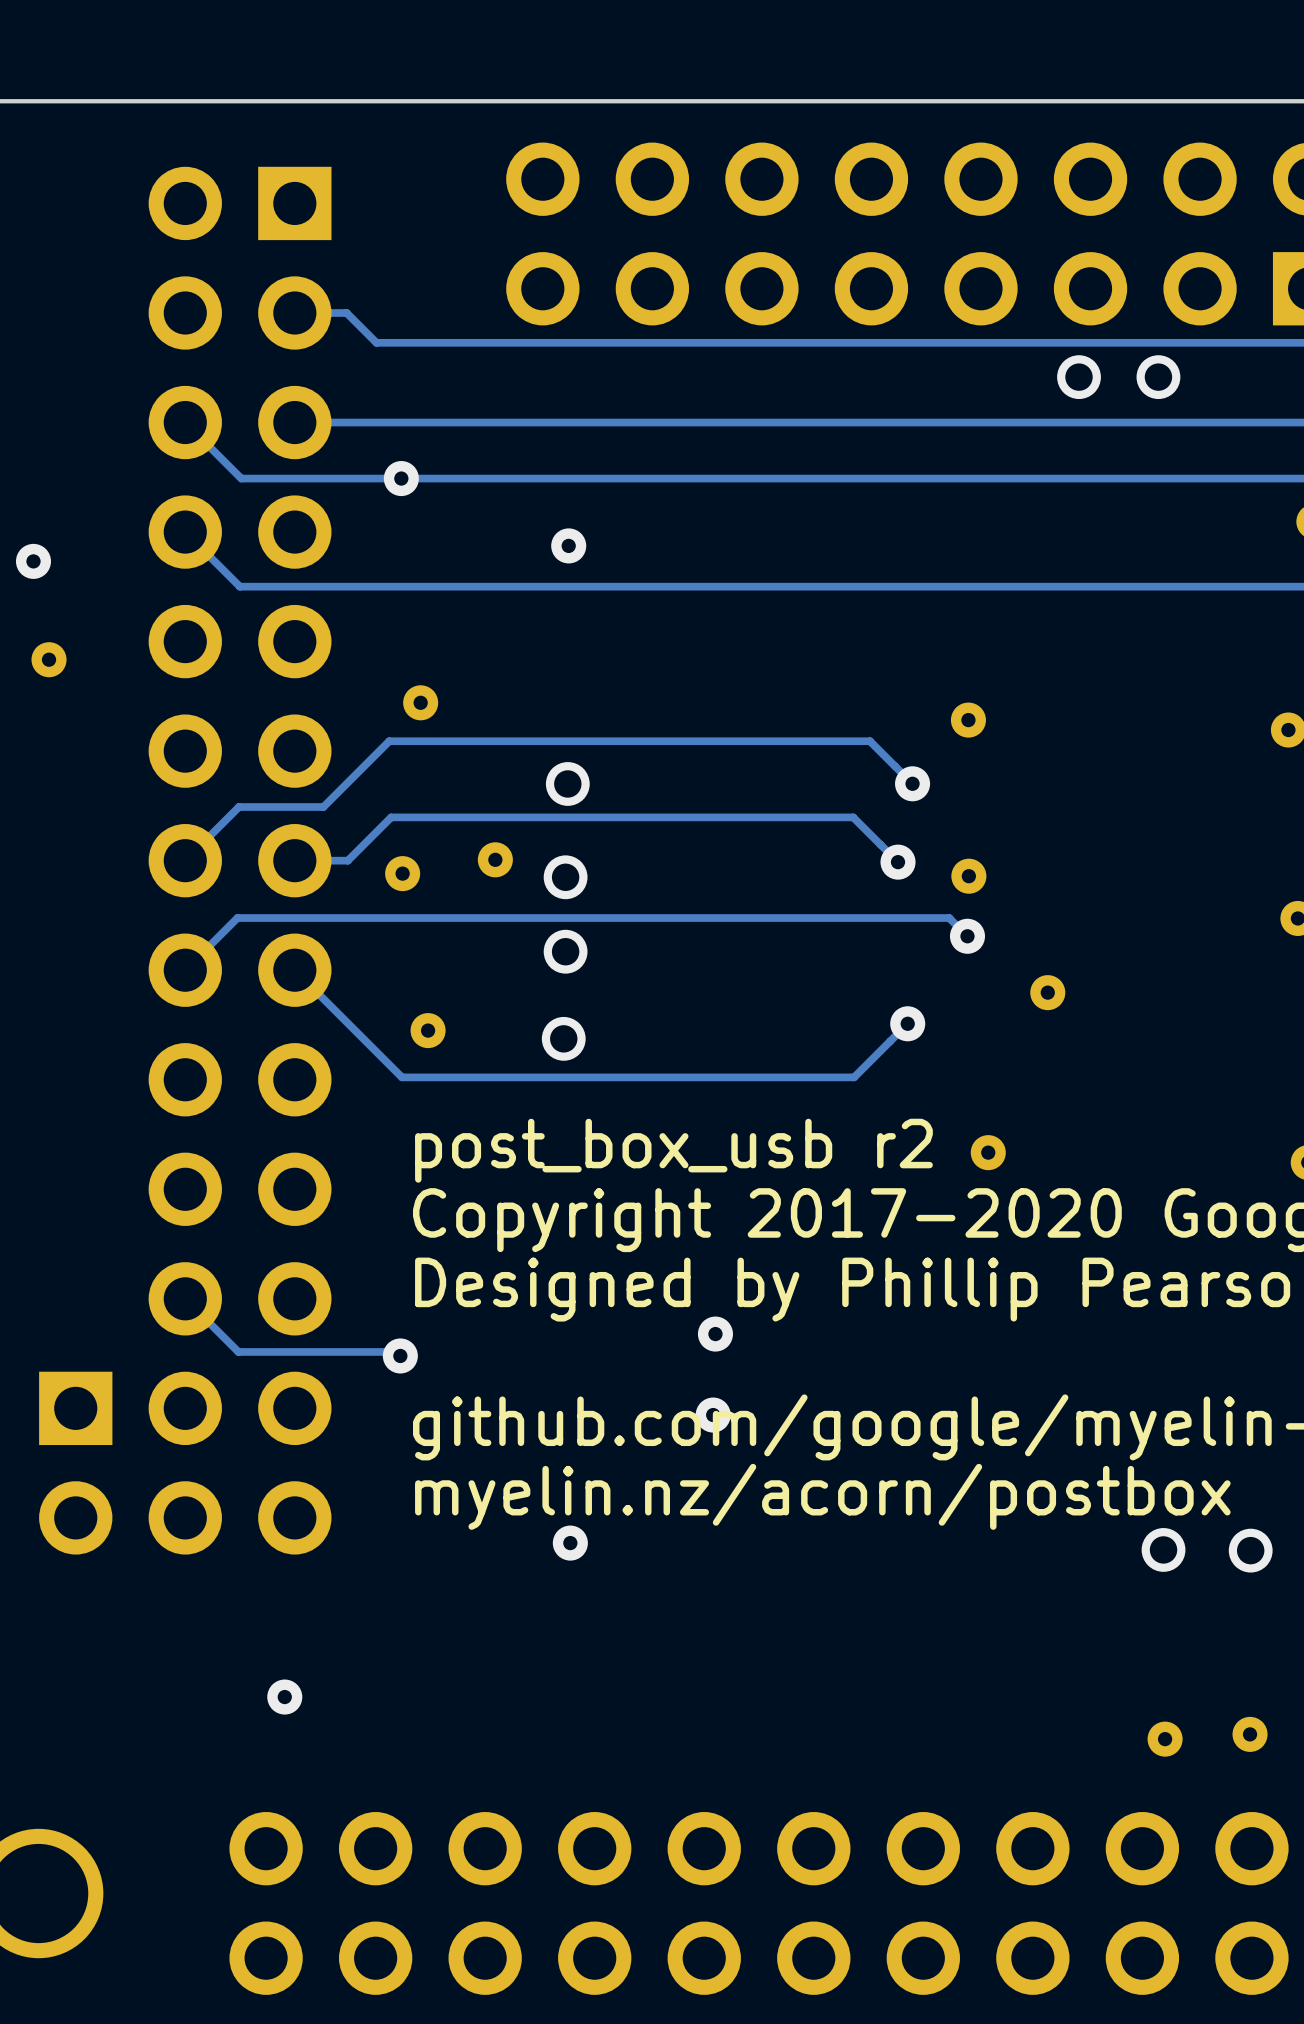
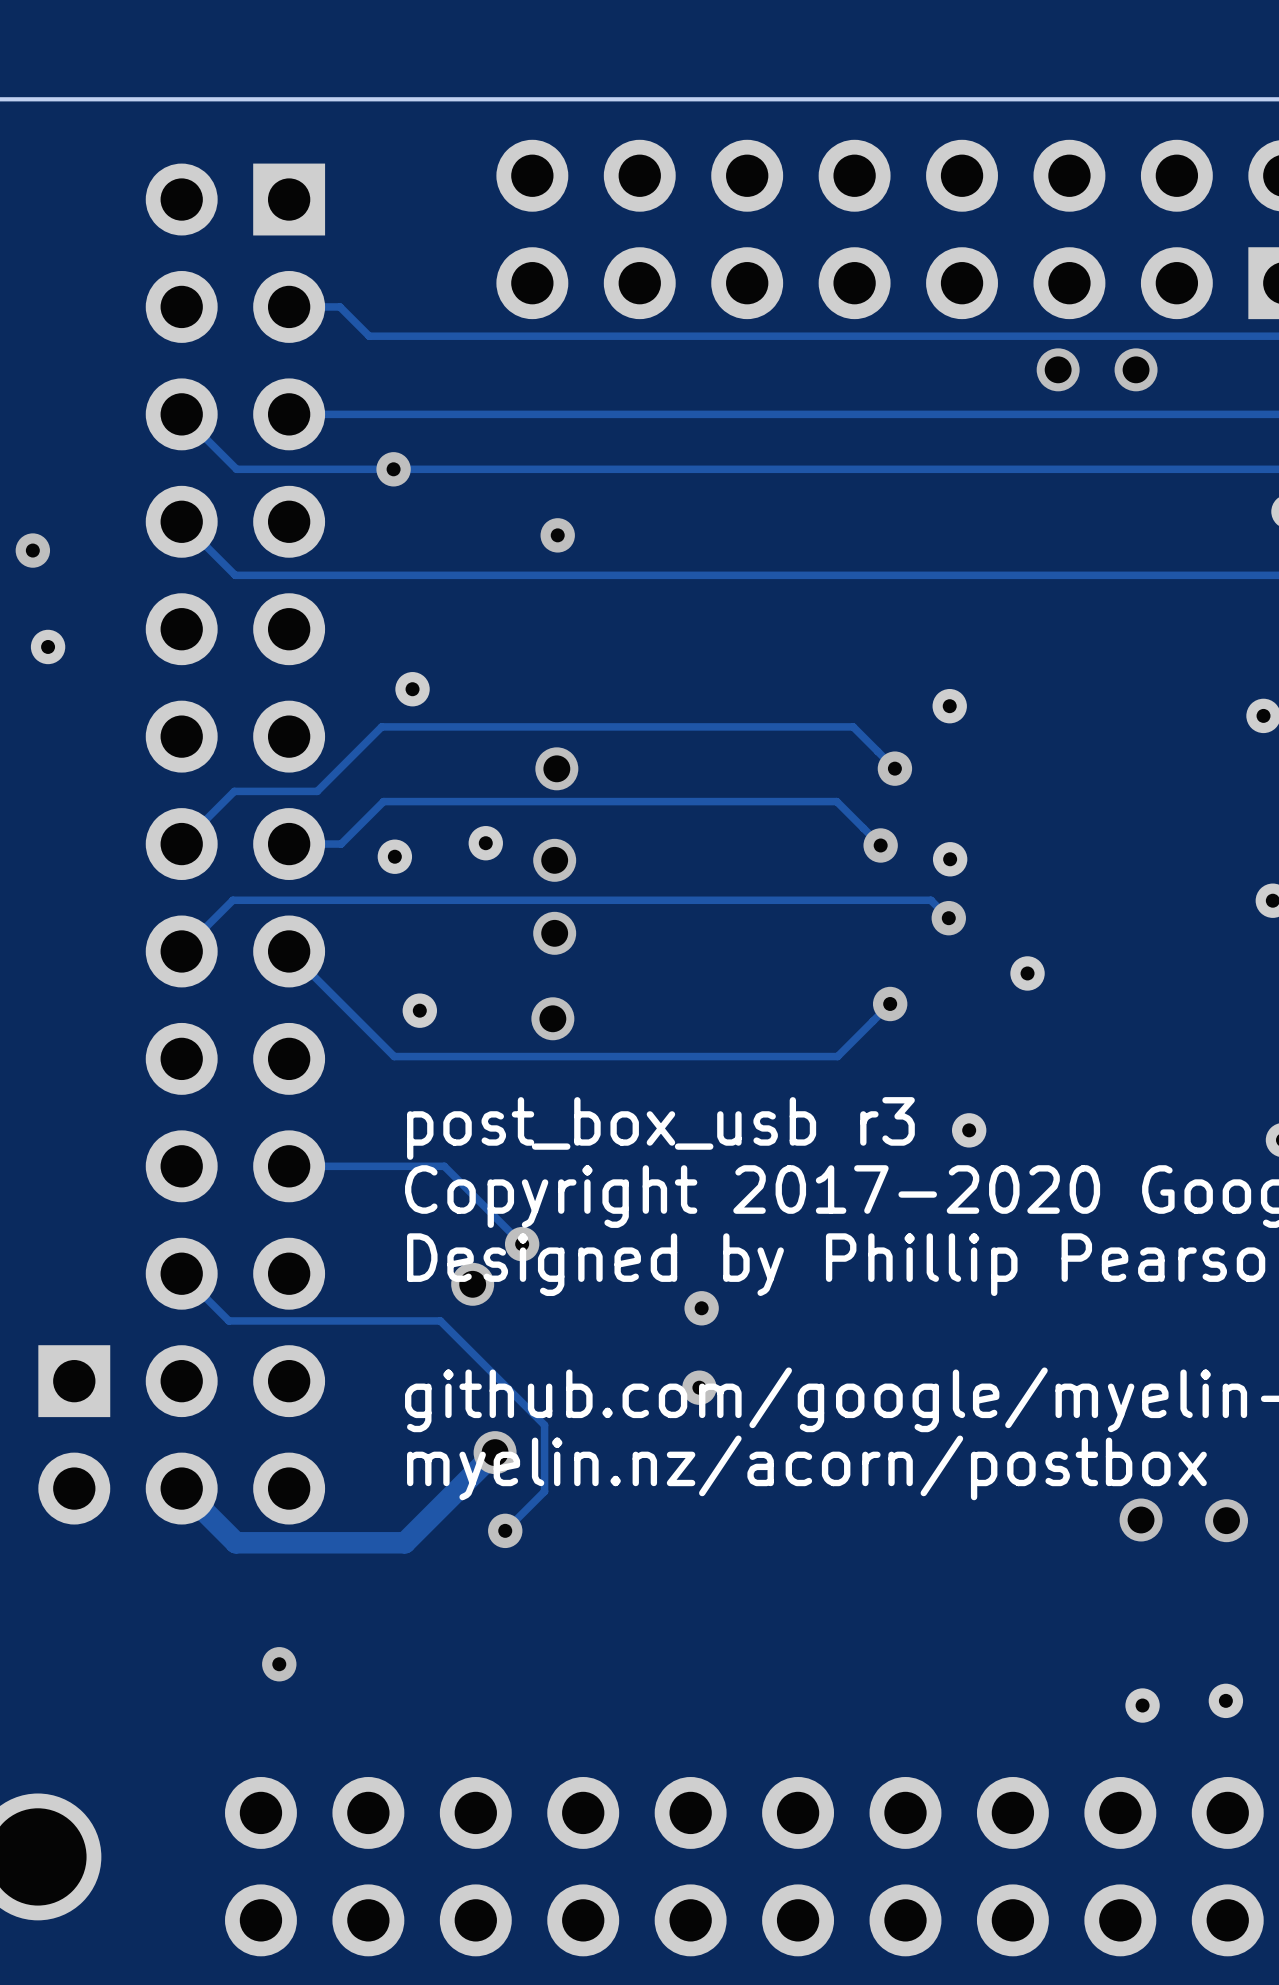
text: post_box_usb r2 (673, 1150) -> post_box_usb r3 (660, 1128)
track: none -> (289, 1166) (444, 1166) (522, 1244)
via: none -> (522, 1244)
via: none -> (472, 1284)
track: (233, 1346) (238, 1351) (396, 1351) (400, 1355) -> (228, 1320) (440, 1320) (544, 1425) (544, 1491) (505, 1530)
via: (400, 1355) -> none
track: none -> (495, 1452) (404, 1542) (235, 1542) (181, 1488)
via: none -> (495, 1452)
via position: (570, 1543) -> (505, 1530)

